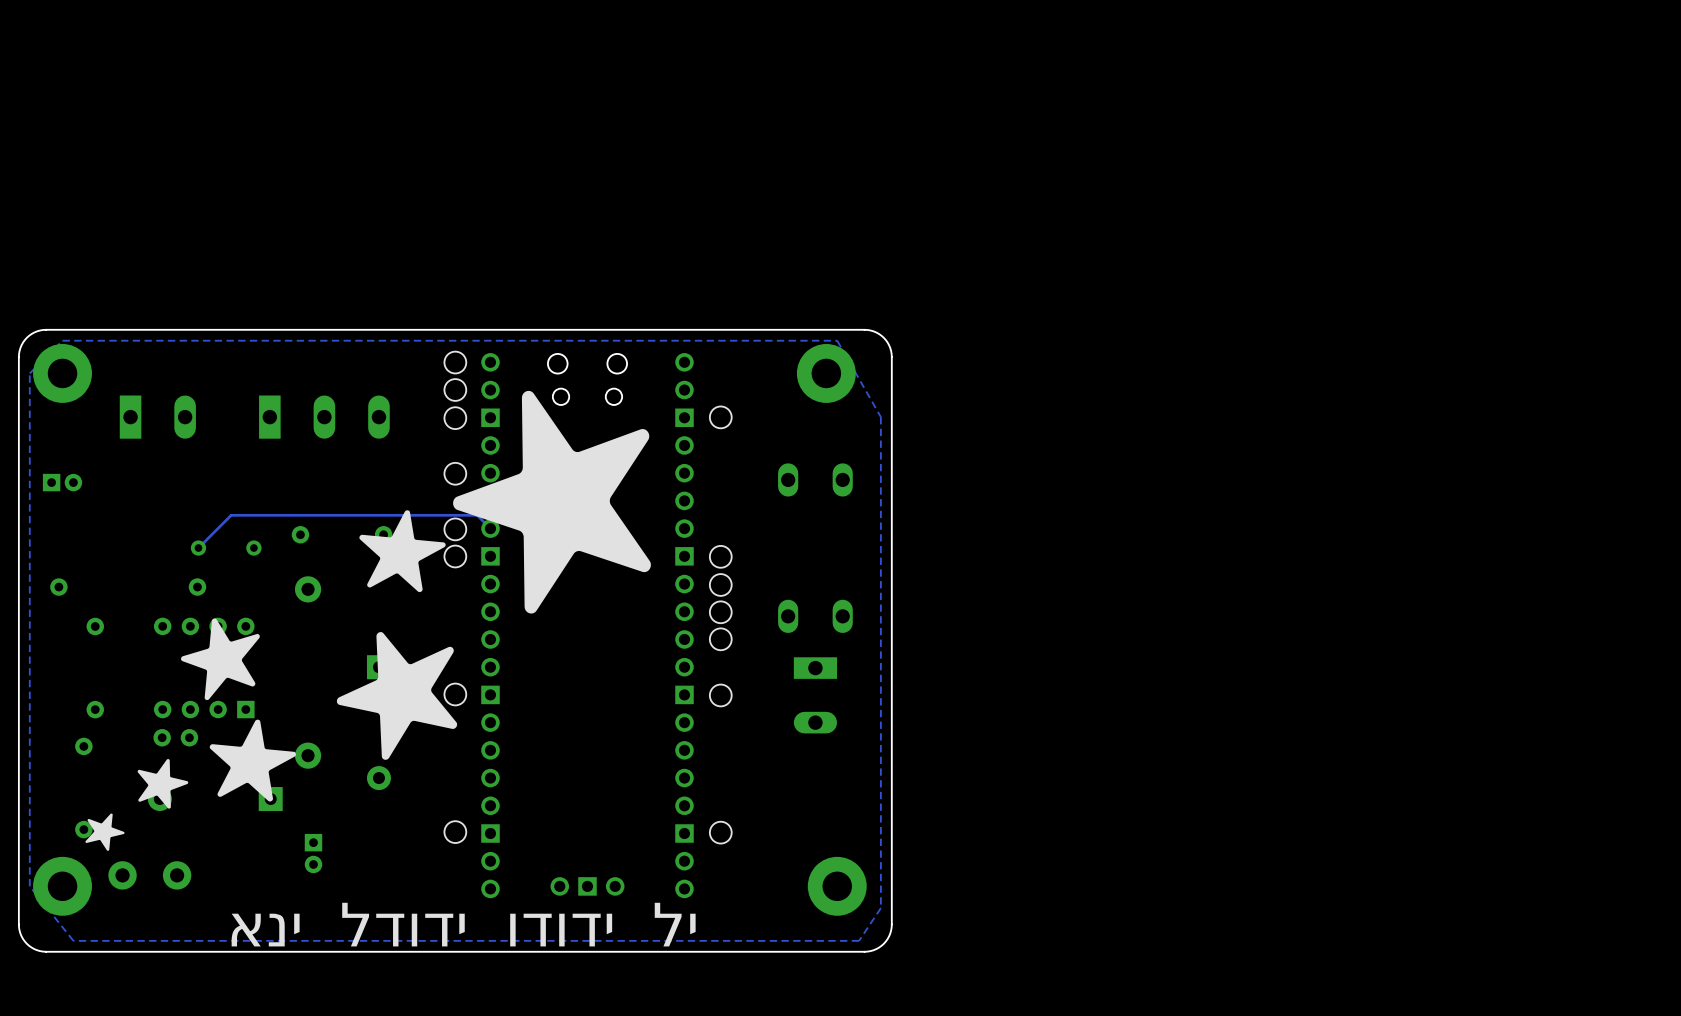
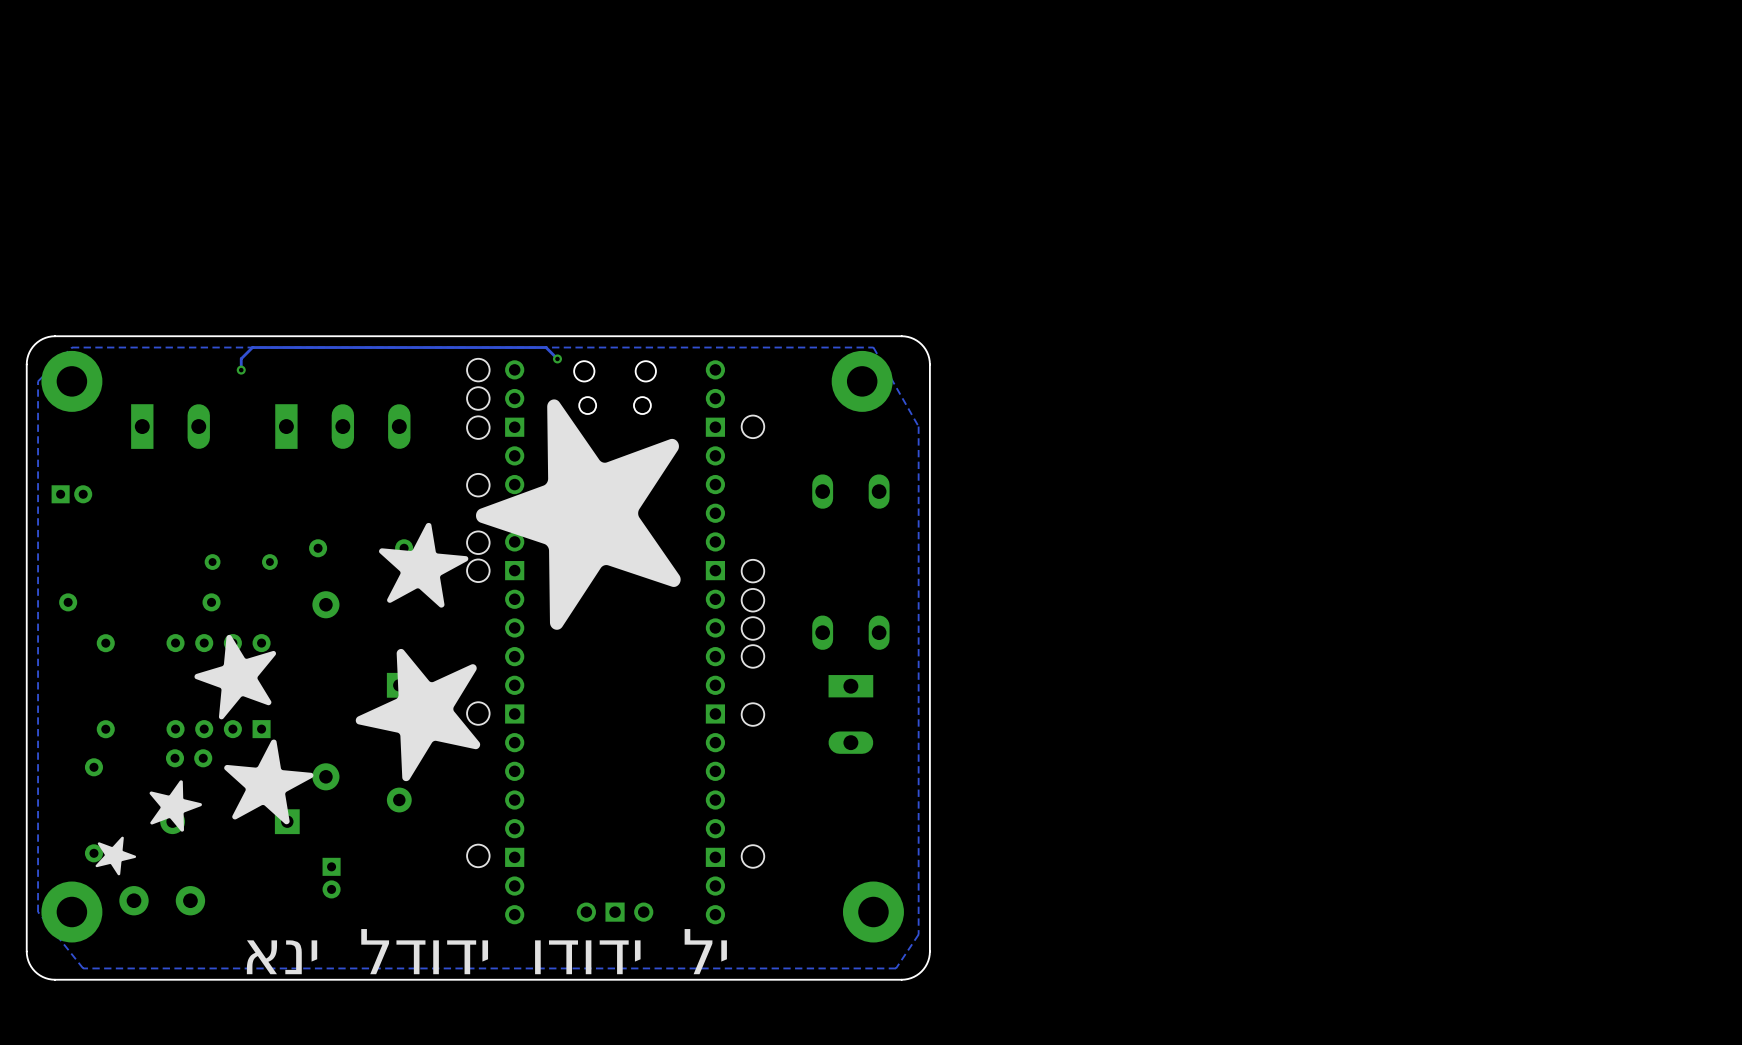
track: none -> (557, 358) (546, 347) (252, 347) (241, 358) (241, 370)
via: none -> (557, 358)
via: none -> (241, 370)
track: (490, 528) (477, 515) (231, 515) (198, 548) -> none

